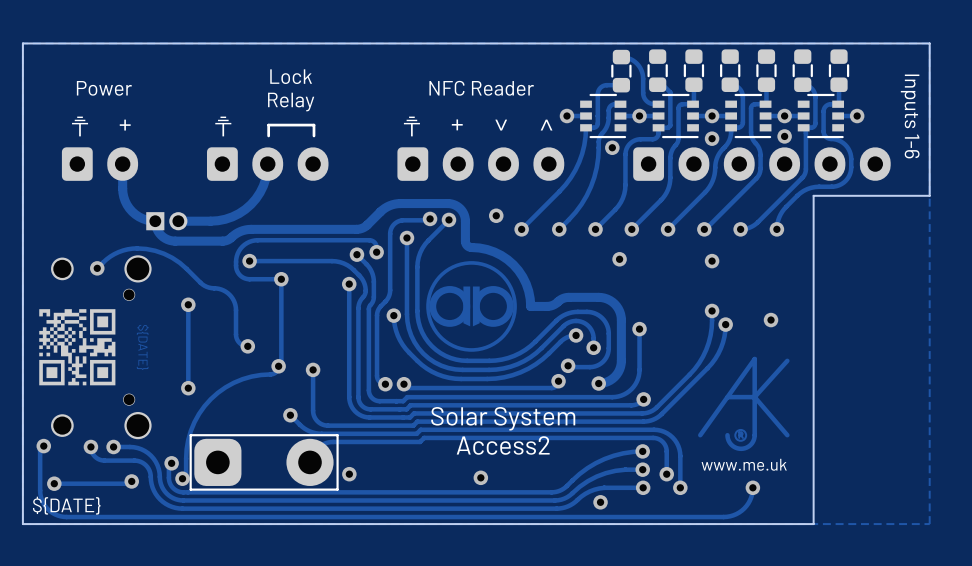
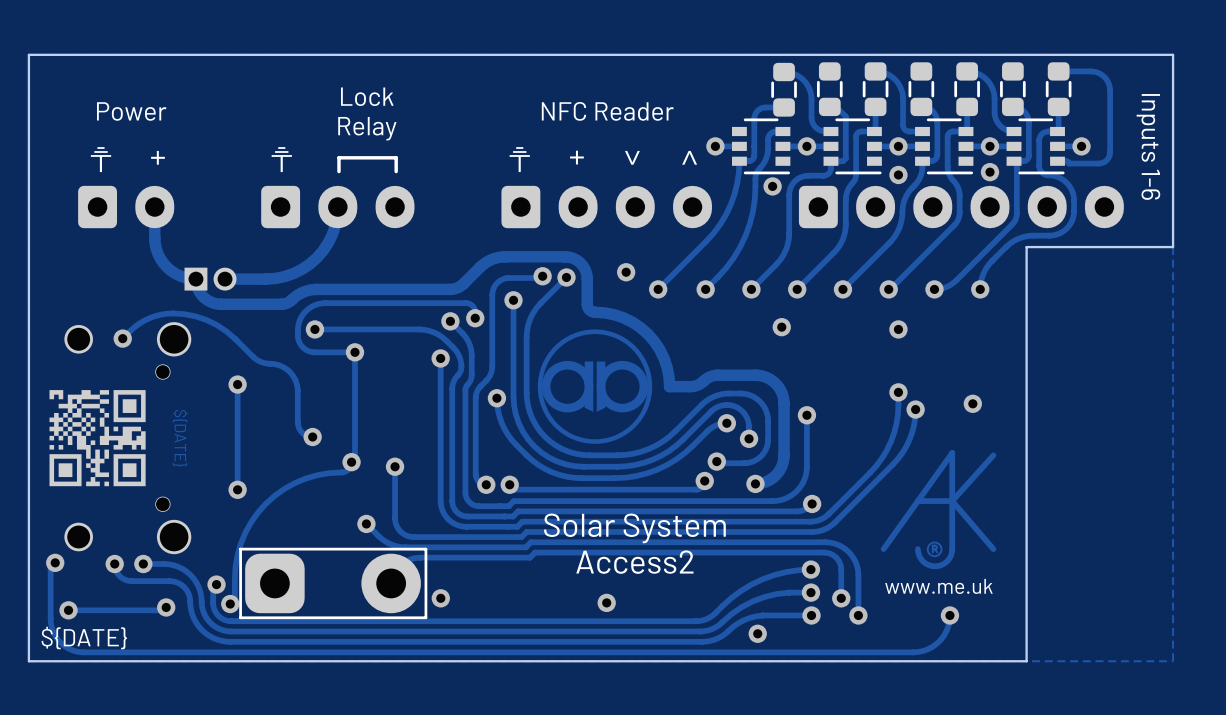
track: none -> (875, 71) (890, 75) (900, 86) (902, 95) (904, 129) (908, 131) (922, 131)
track: none -> (967, 71) (980, 75) (988, 82) (994, 95) (996, 120) (1003, 128) (1014, 131)
track: none -> (1058, 71) (1095, 71) (1107, 80) (1110, 90) (1110, 152) (1106, 160) (1100, 163) (1068, 163) (1067, 161) (1057, 161)

